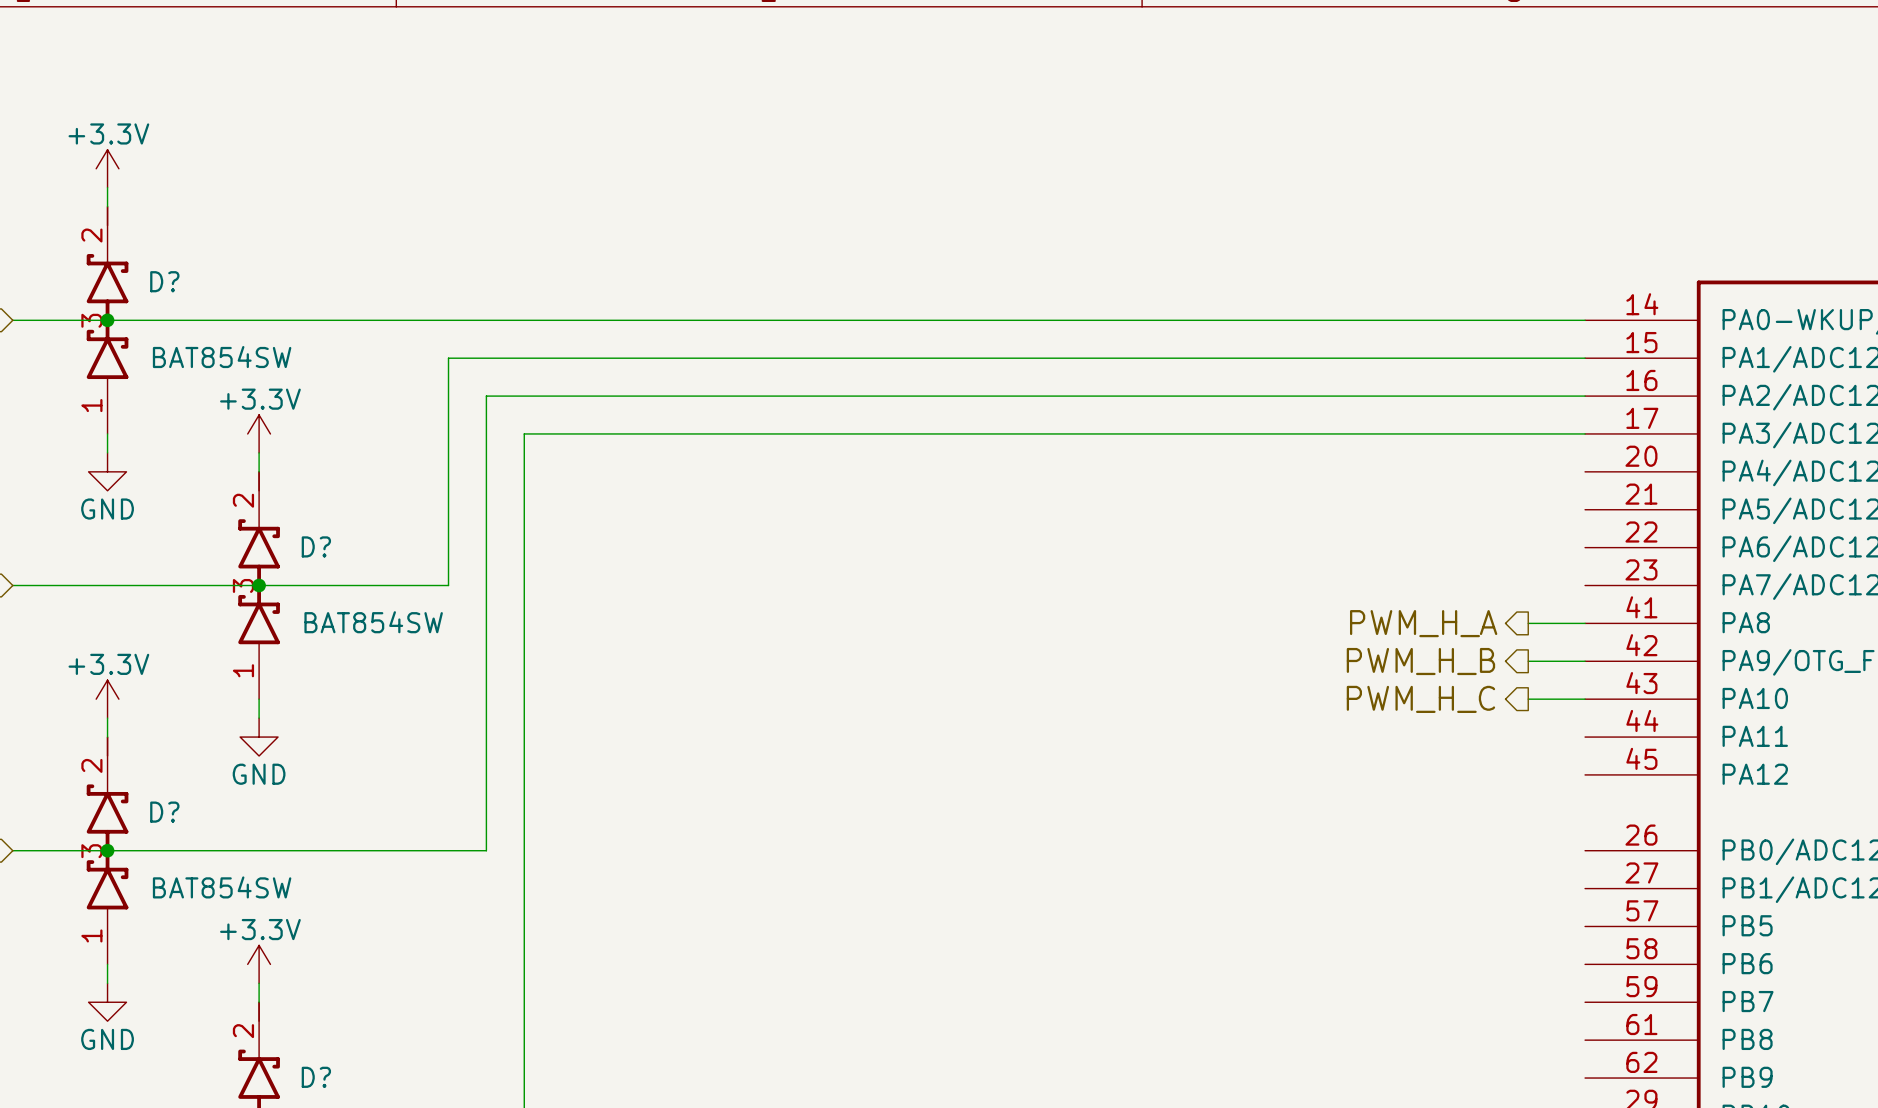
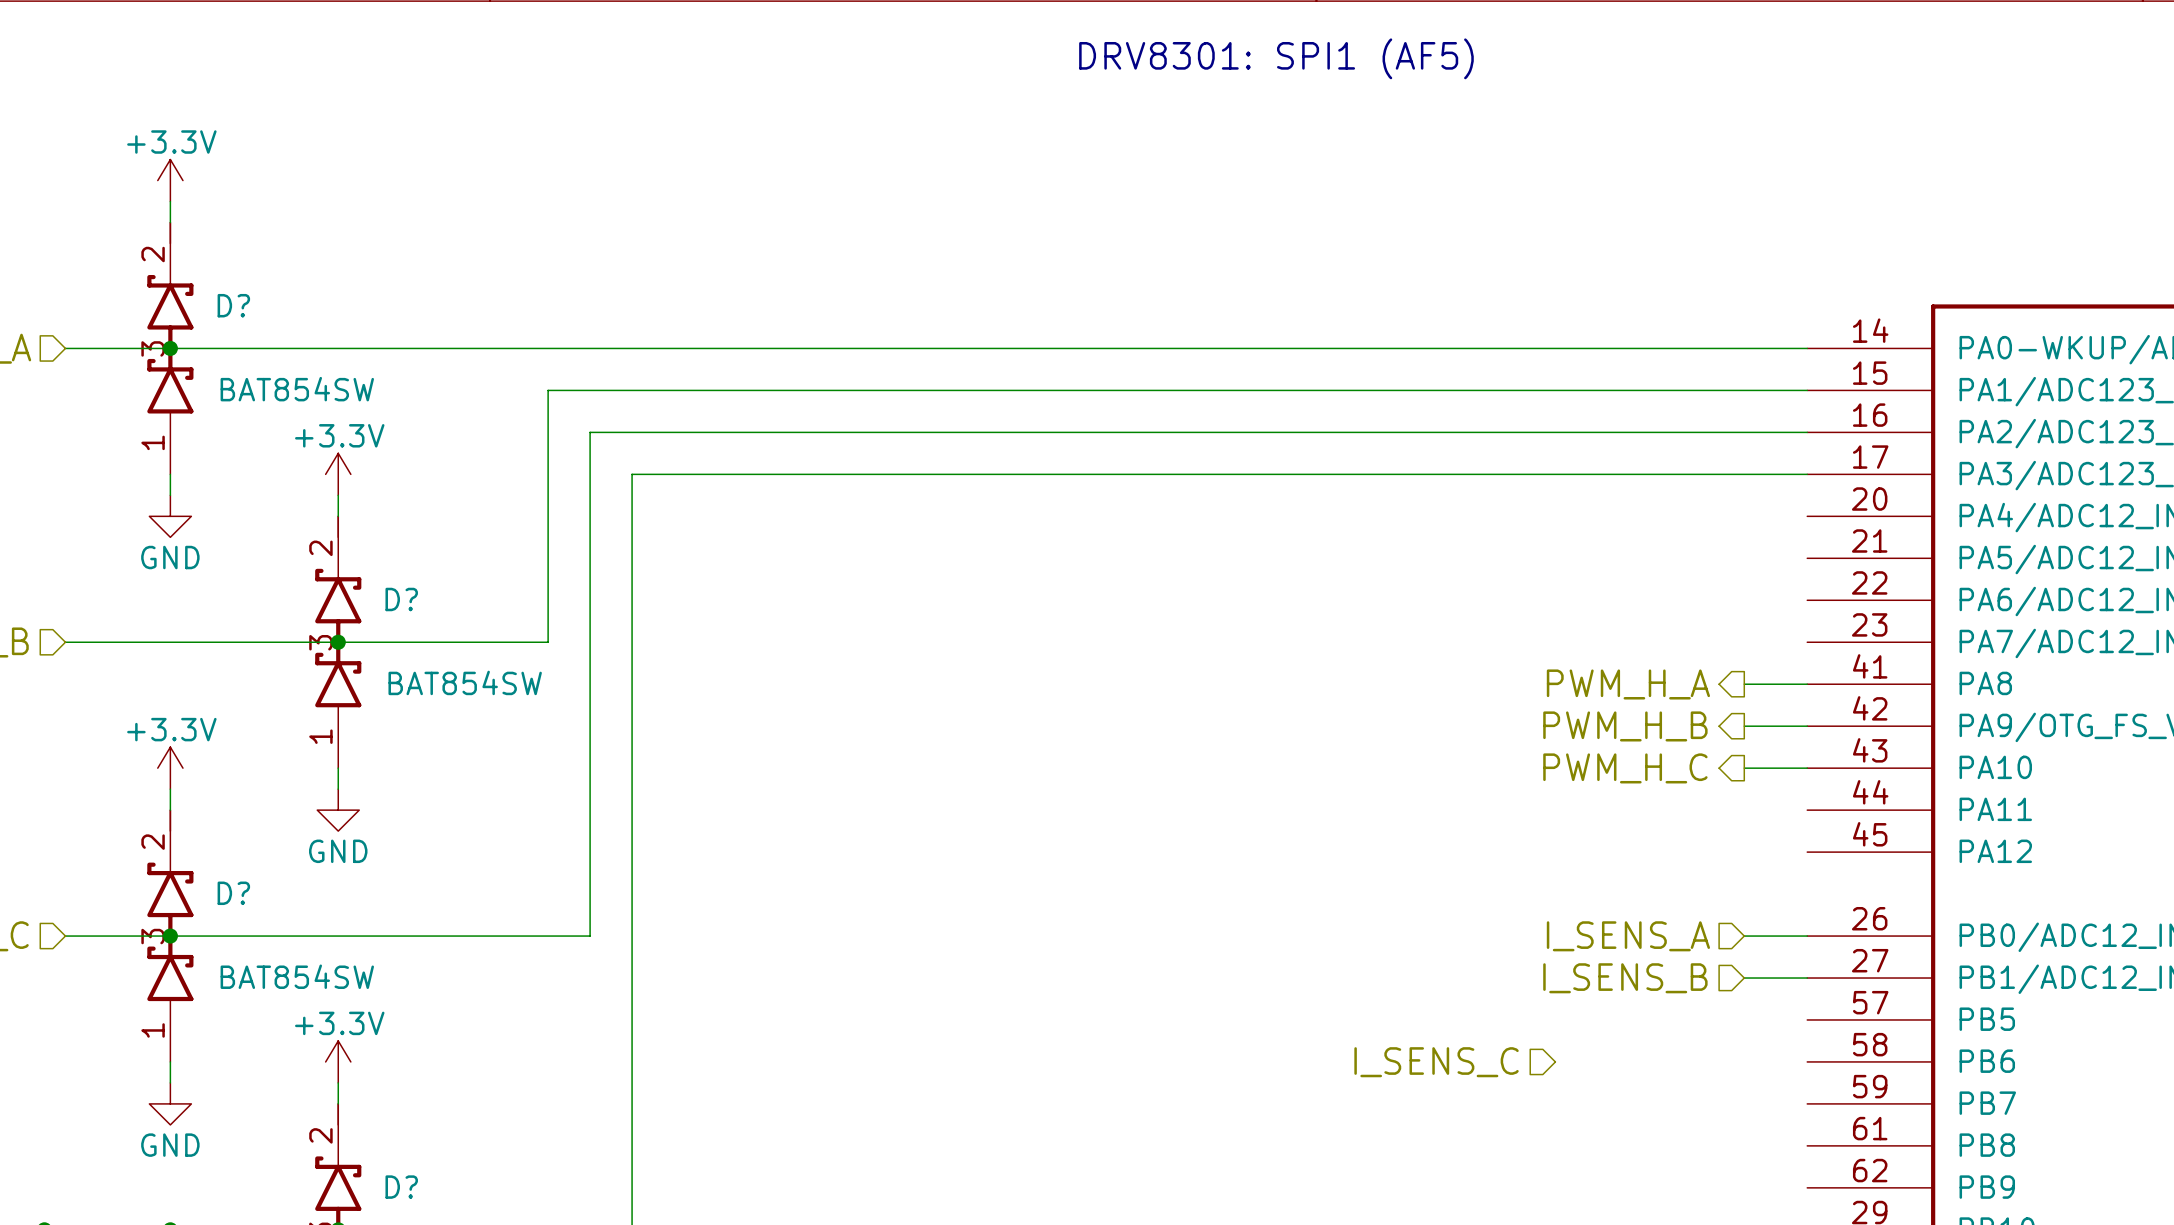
text: none -> DRV8301: SPI1 (AF5) (1276, 58)
hierarchical label: none -> I_SENS_A (1628, 936)
wire: none -> (1744, 936) (1807, 936)
hierarchical label: none -> I_SENS_B (1625, 978)
wire: none -> (1744, 978) (1807, 978)
hierarchical label: none -> I_SENS_C (1436, 1062)

